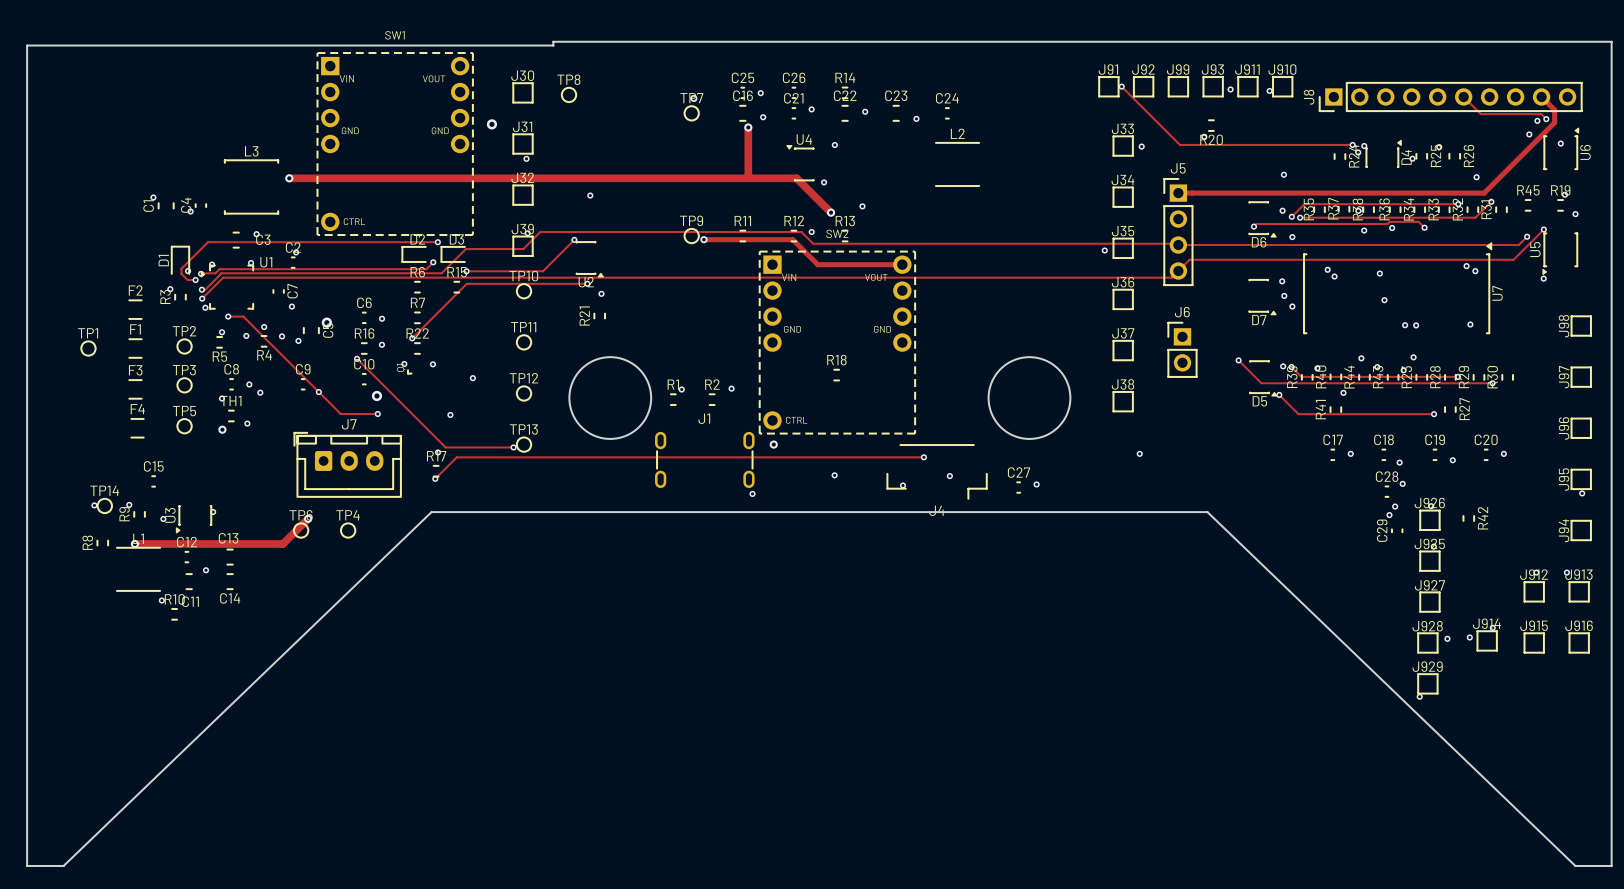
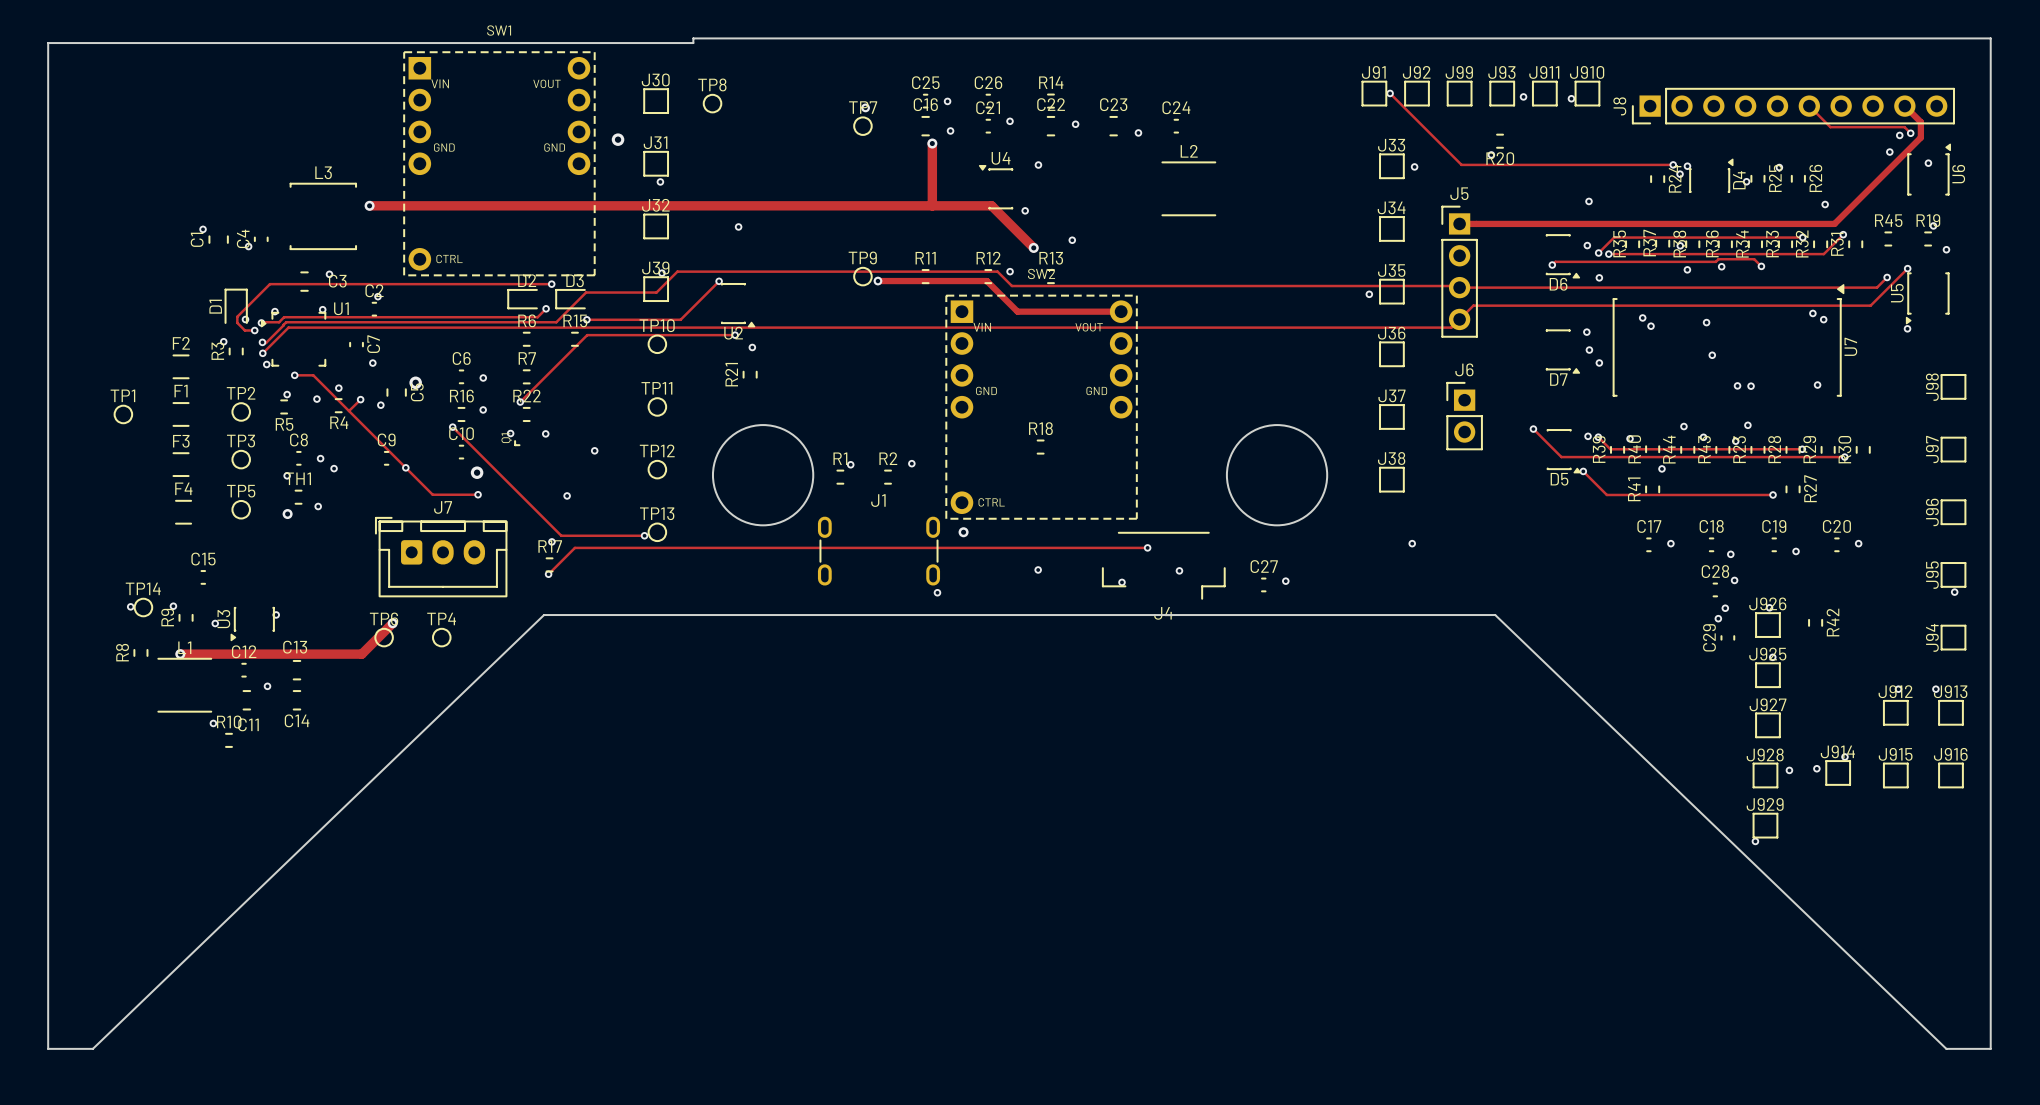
track: none -> (360, 399) (349, 411)

